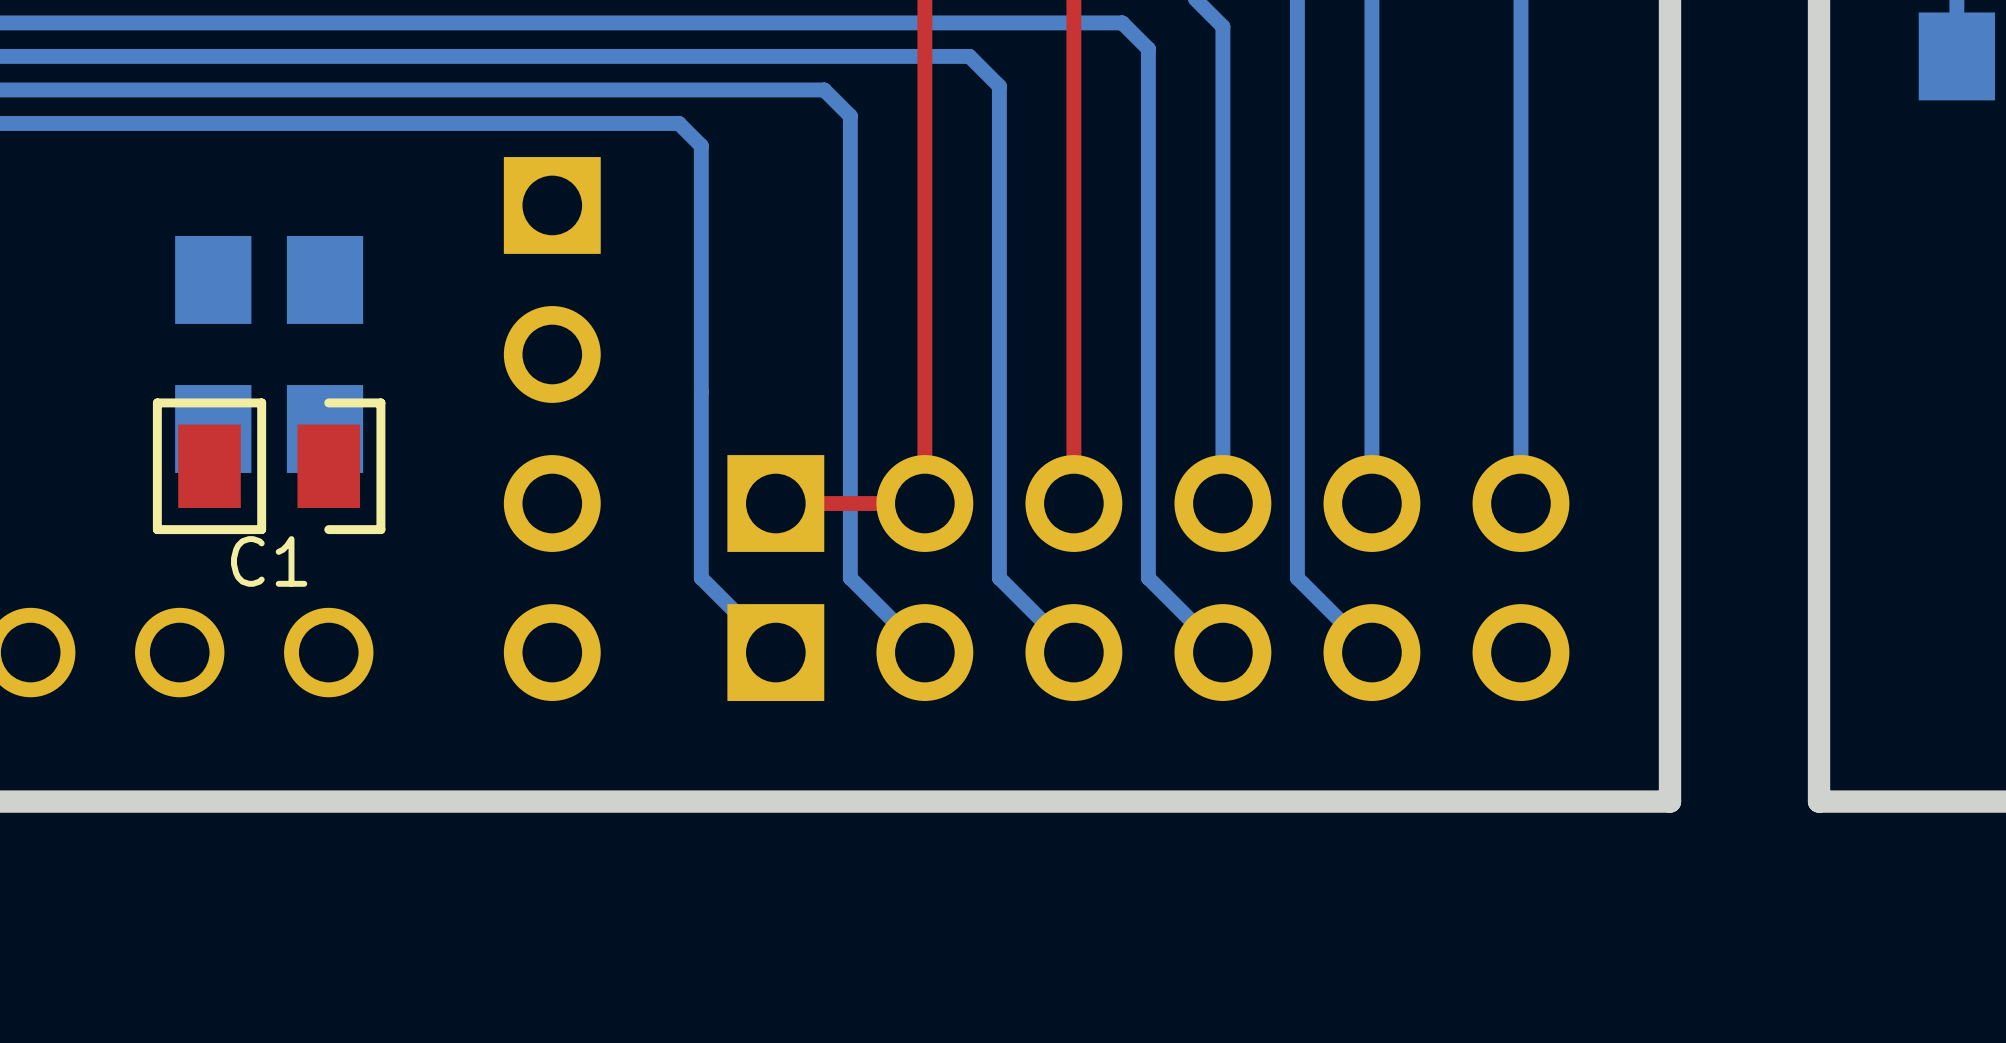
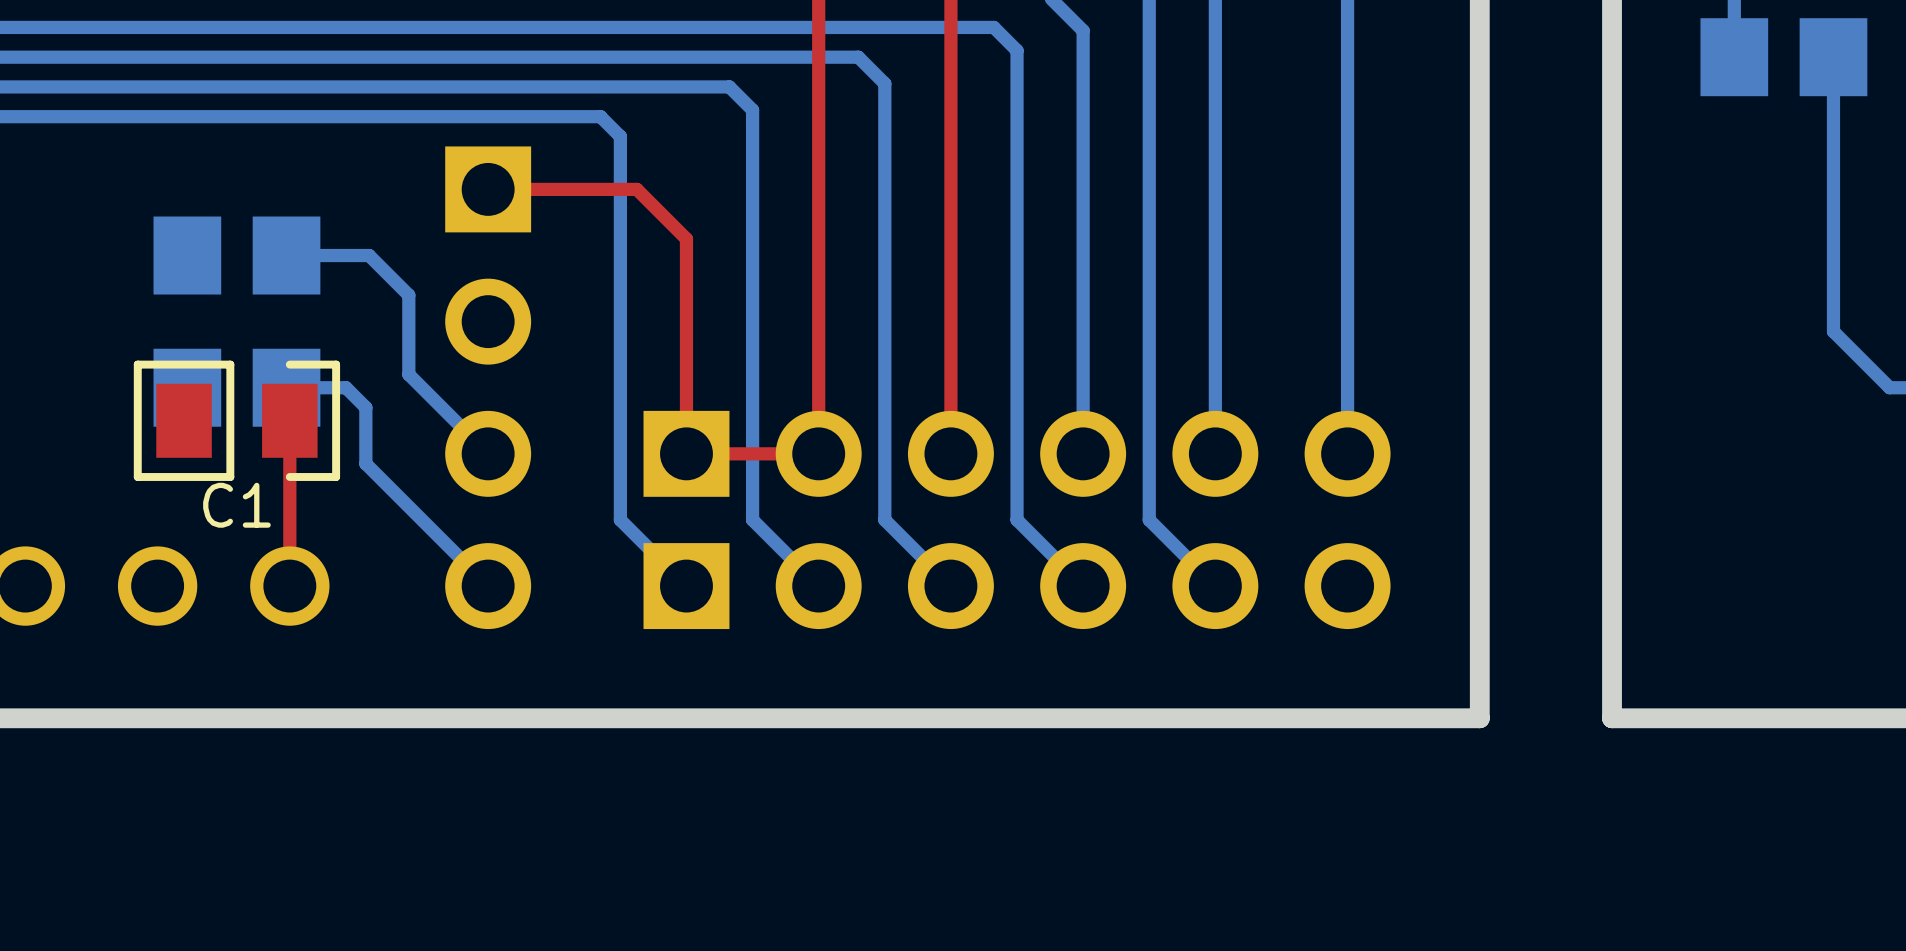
top track: none -> (488, 189) (636, 189) (686, 238) (686, 453)
bottom track: none -> (286, 255) (369, 255) (408, 295) (408, 374) (488, 453)
bottom track: none -> (286, 387) (346, 387) (365, 407) (365, 463) (488, 586)
top track: none -> (289, 420) (289, 586)

